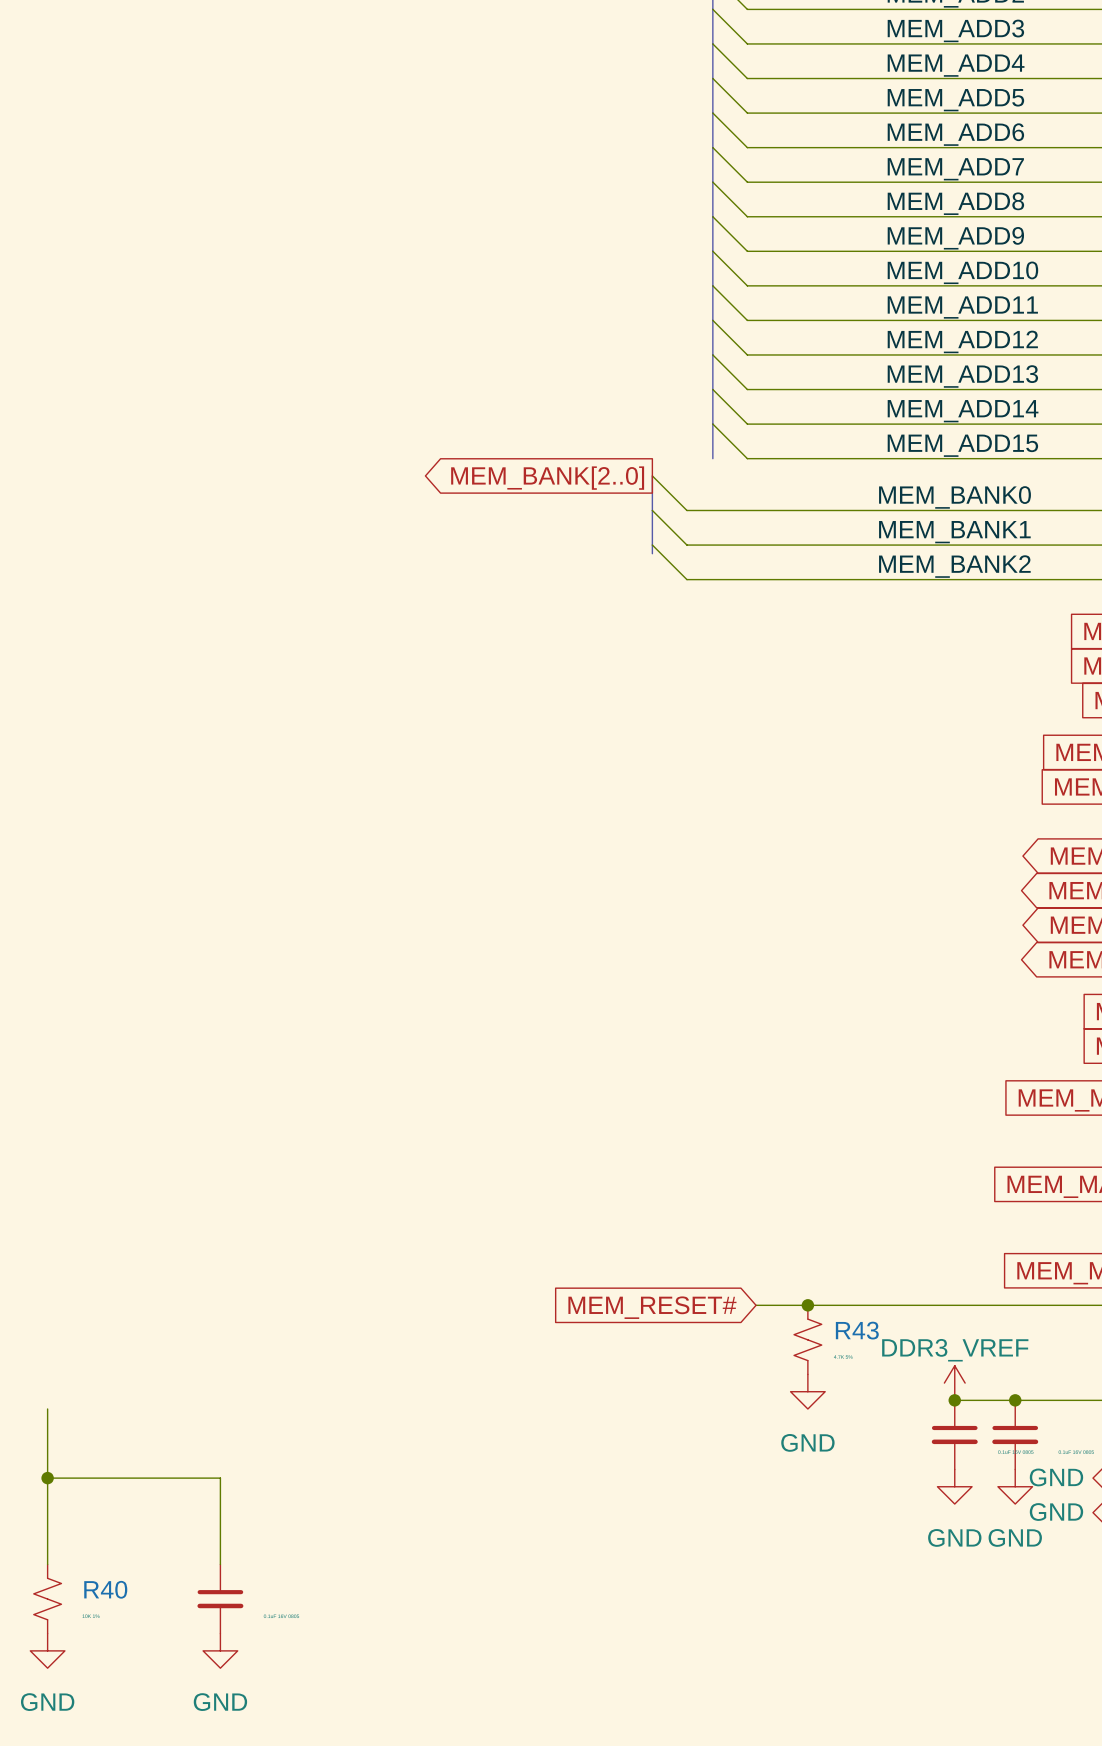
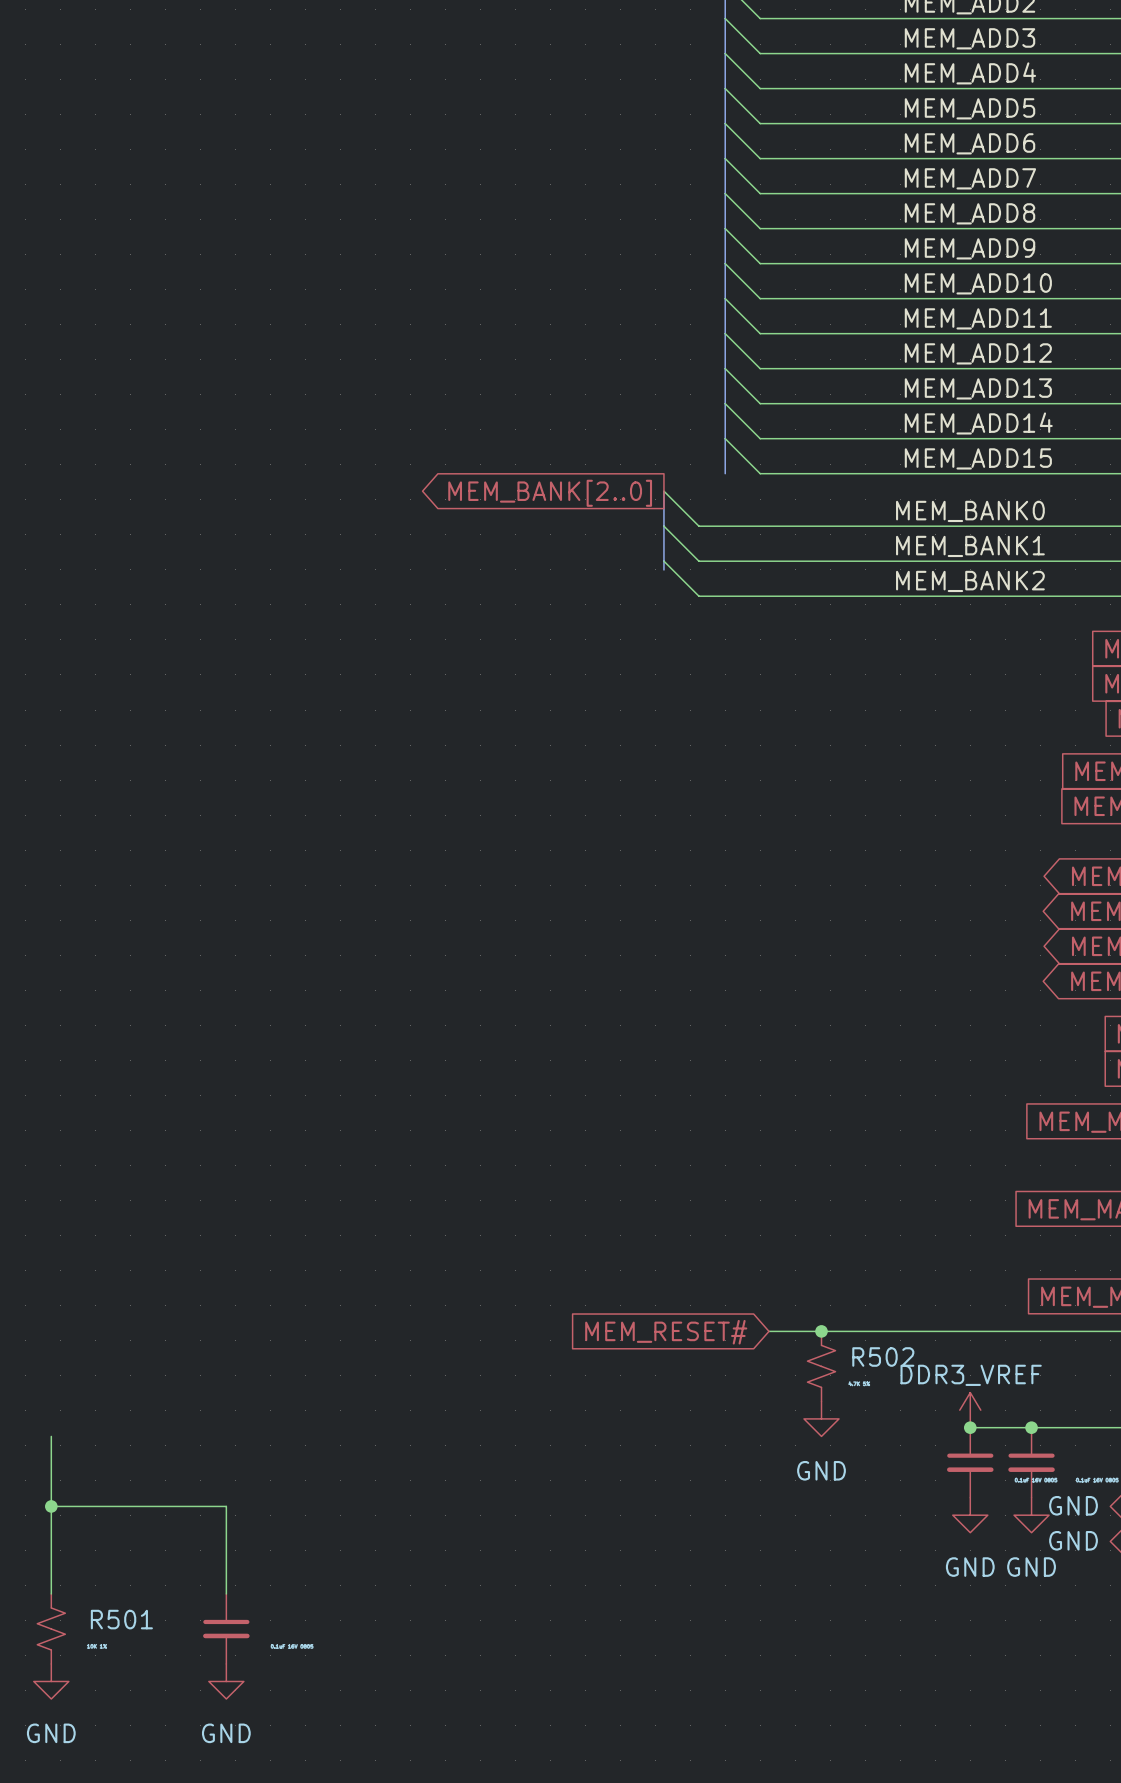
R43 name: R43 (857, 1330) -> R502 (883, 1357)
R40 name: R40 (105, 1589) -> R501 (121, 1619)

